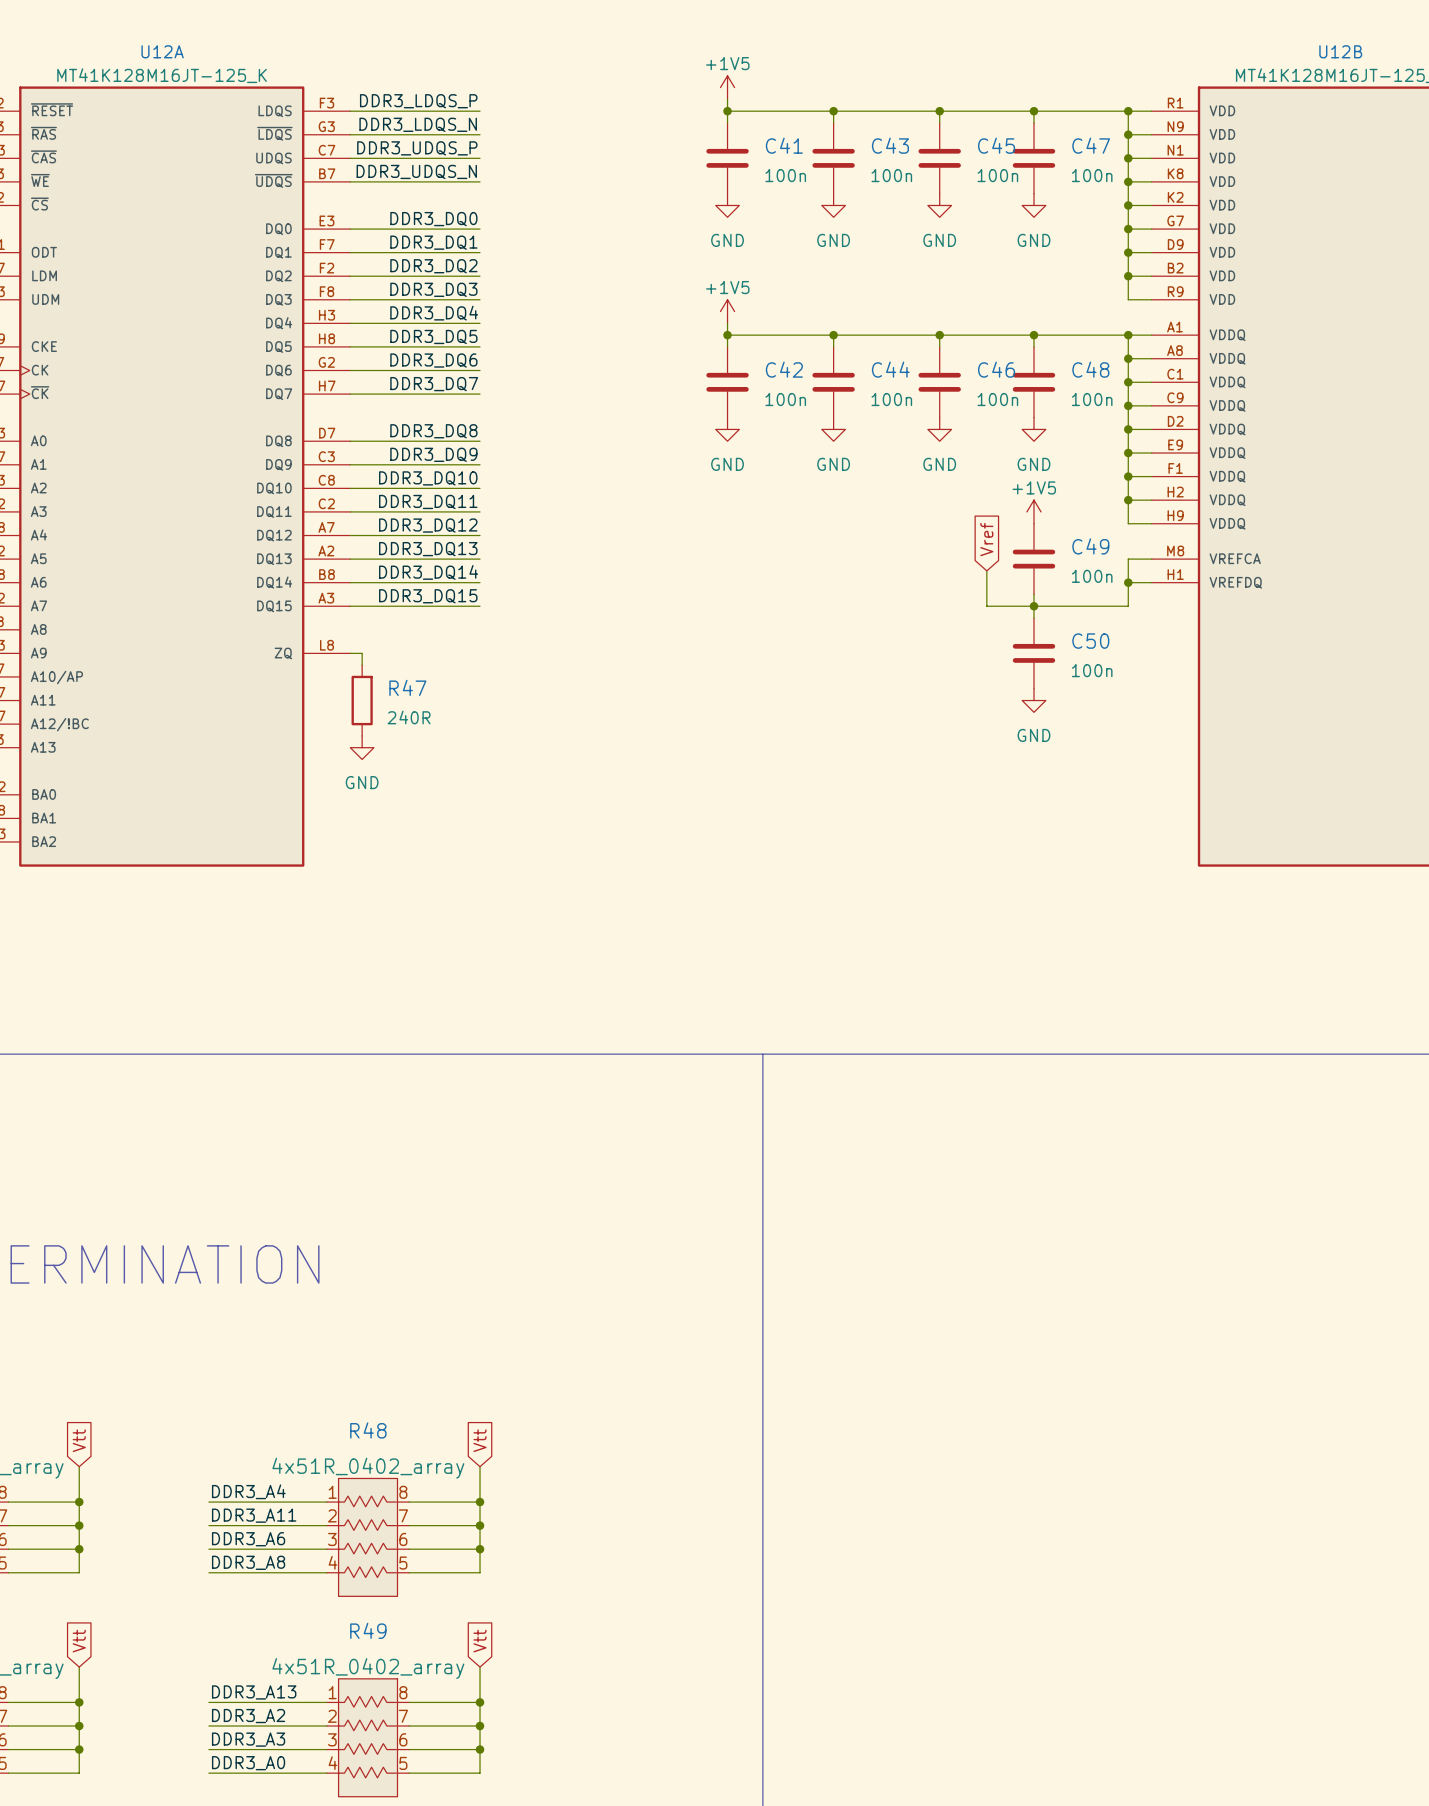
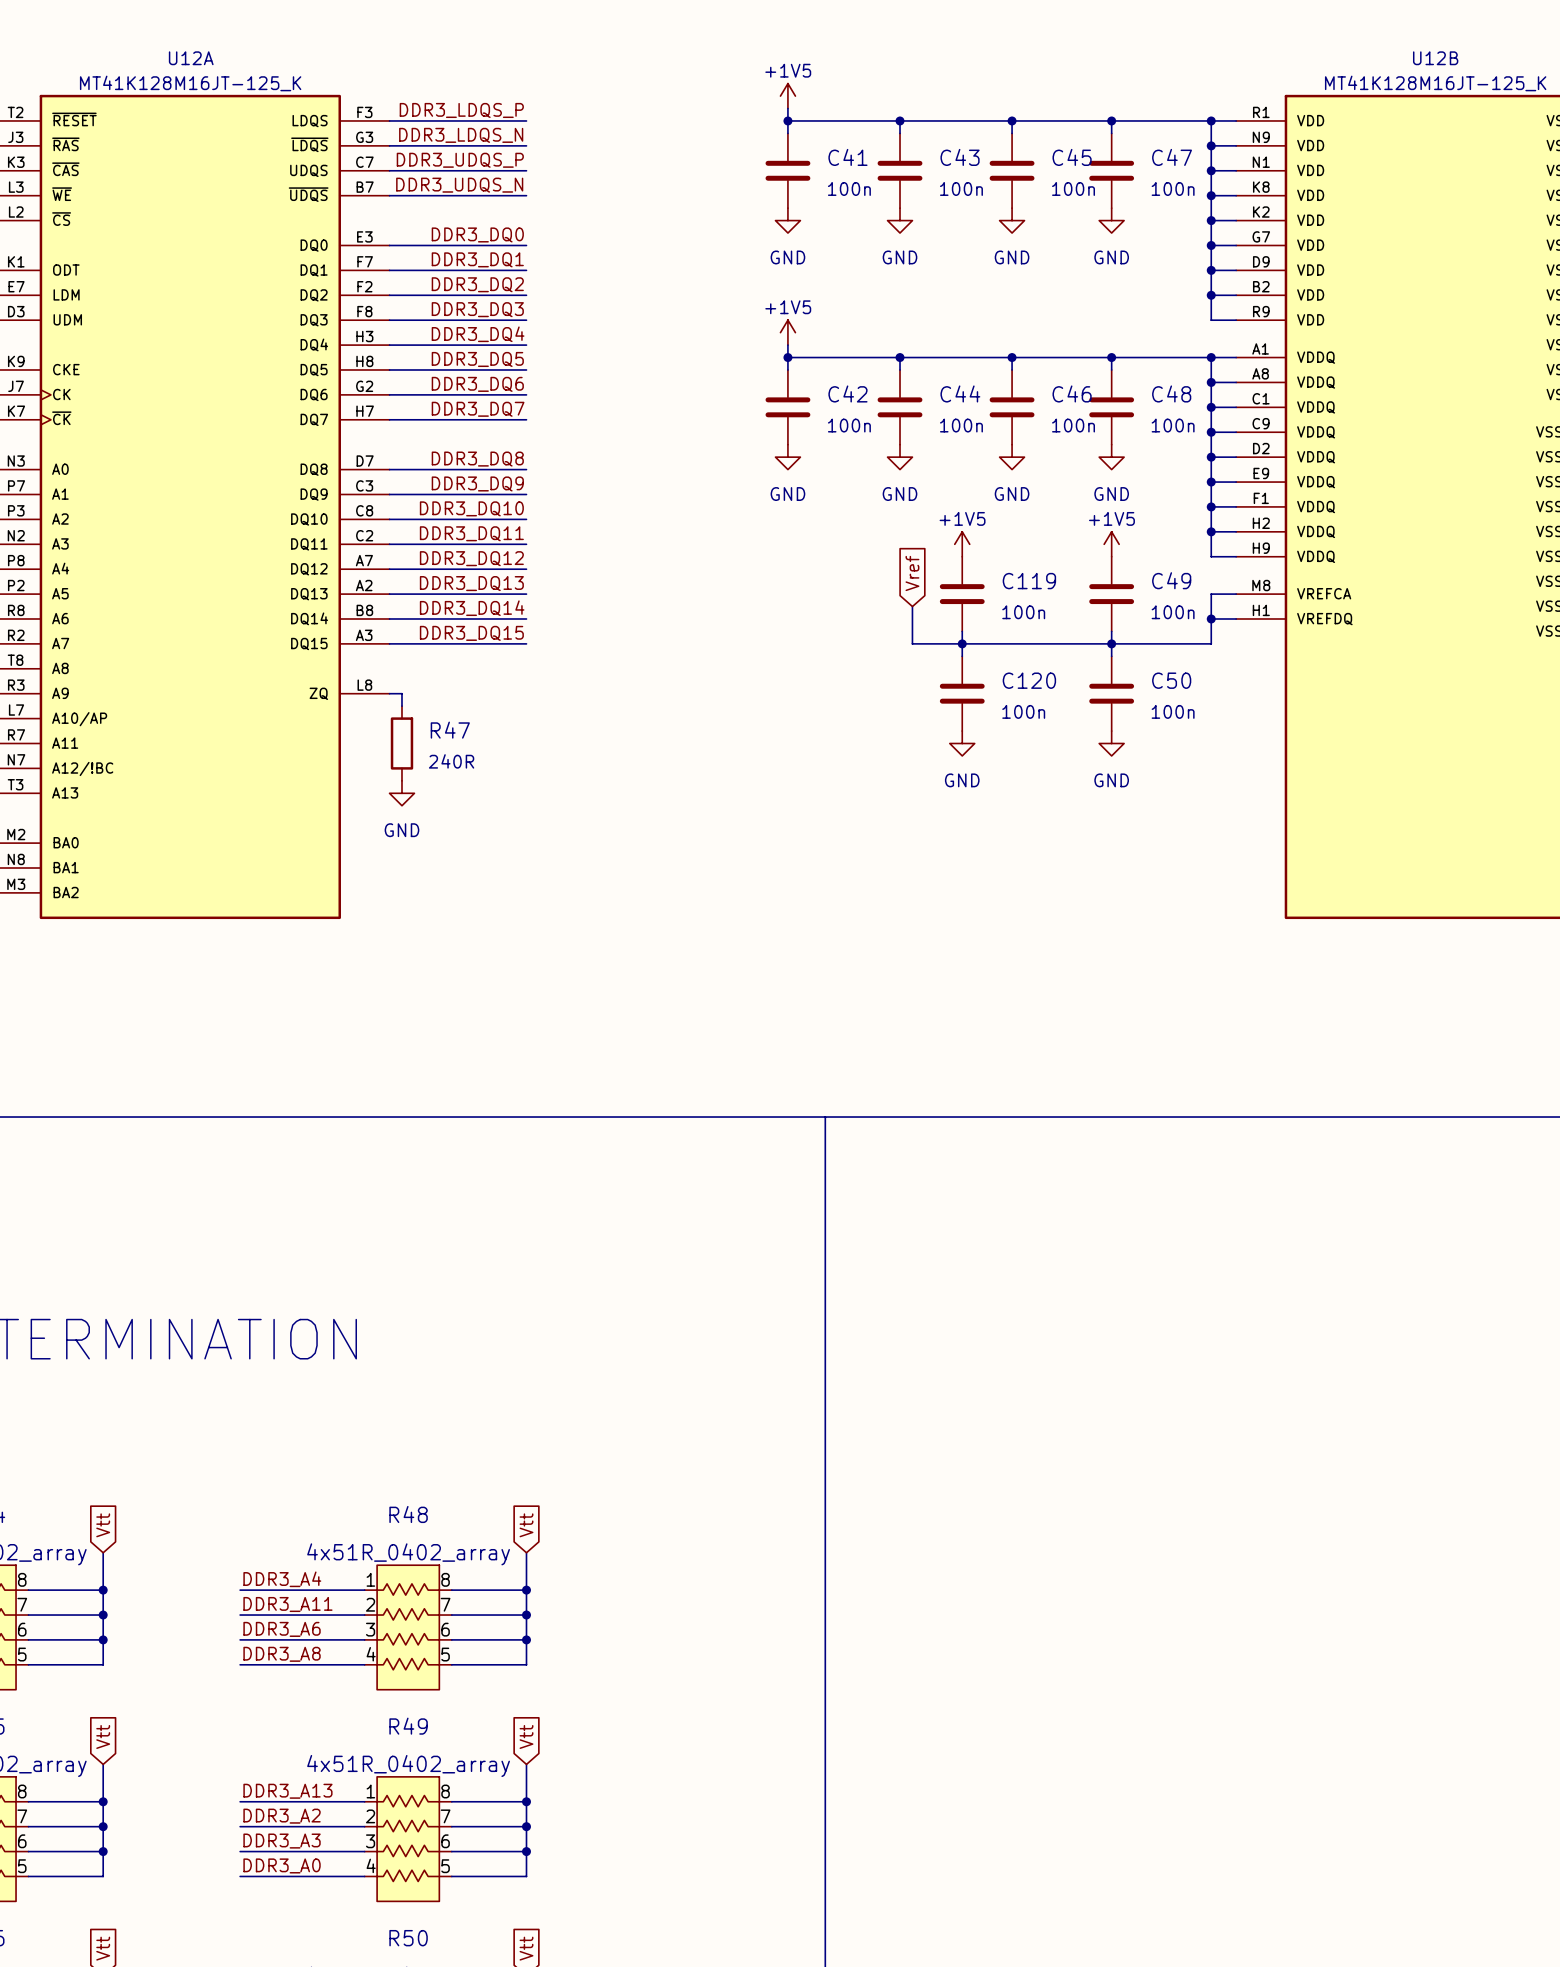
power symbol: none -> +1V5 (962, 544)
global label position: Vref (986, 539) -> Vref (912, 573)
C119: none -> (962, 594)
wire: (986, 570) (986, 606) -> (912, 606) (912, 643) (1061, 643)
wire: none -> (962, 631) (962, 656)
junction: none -> (962, 643)
C120: none -> (962, 693)
power symbol: none -> GND (962, 743)

